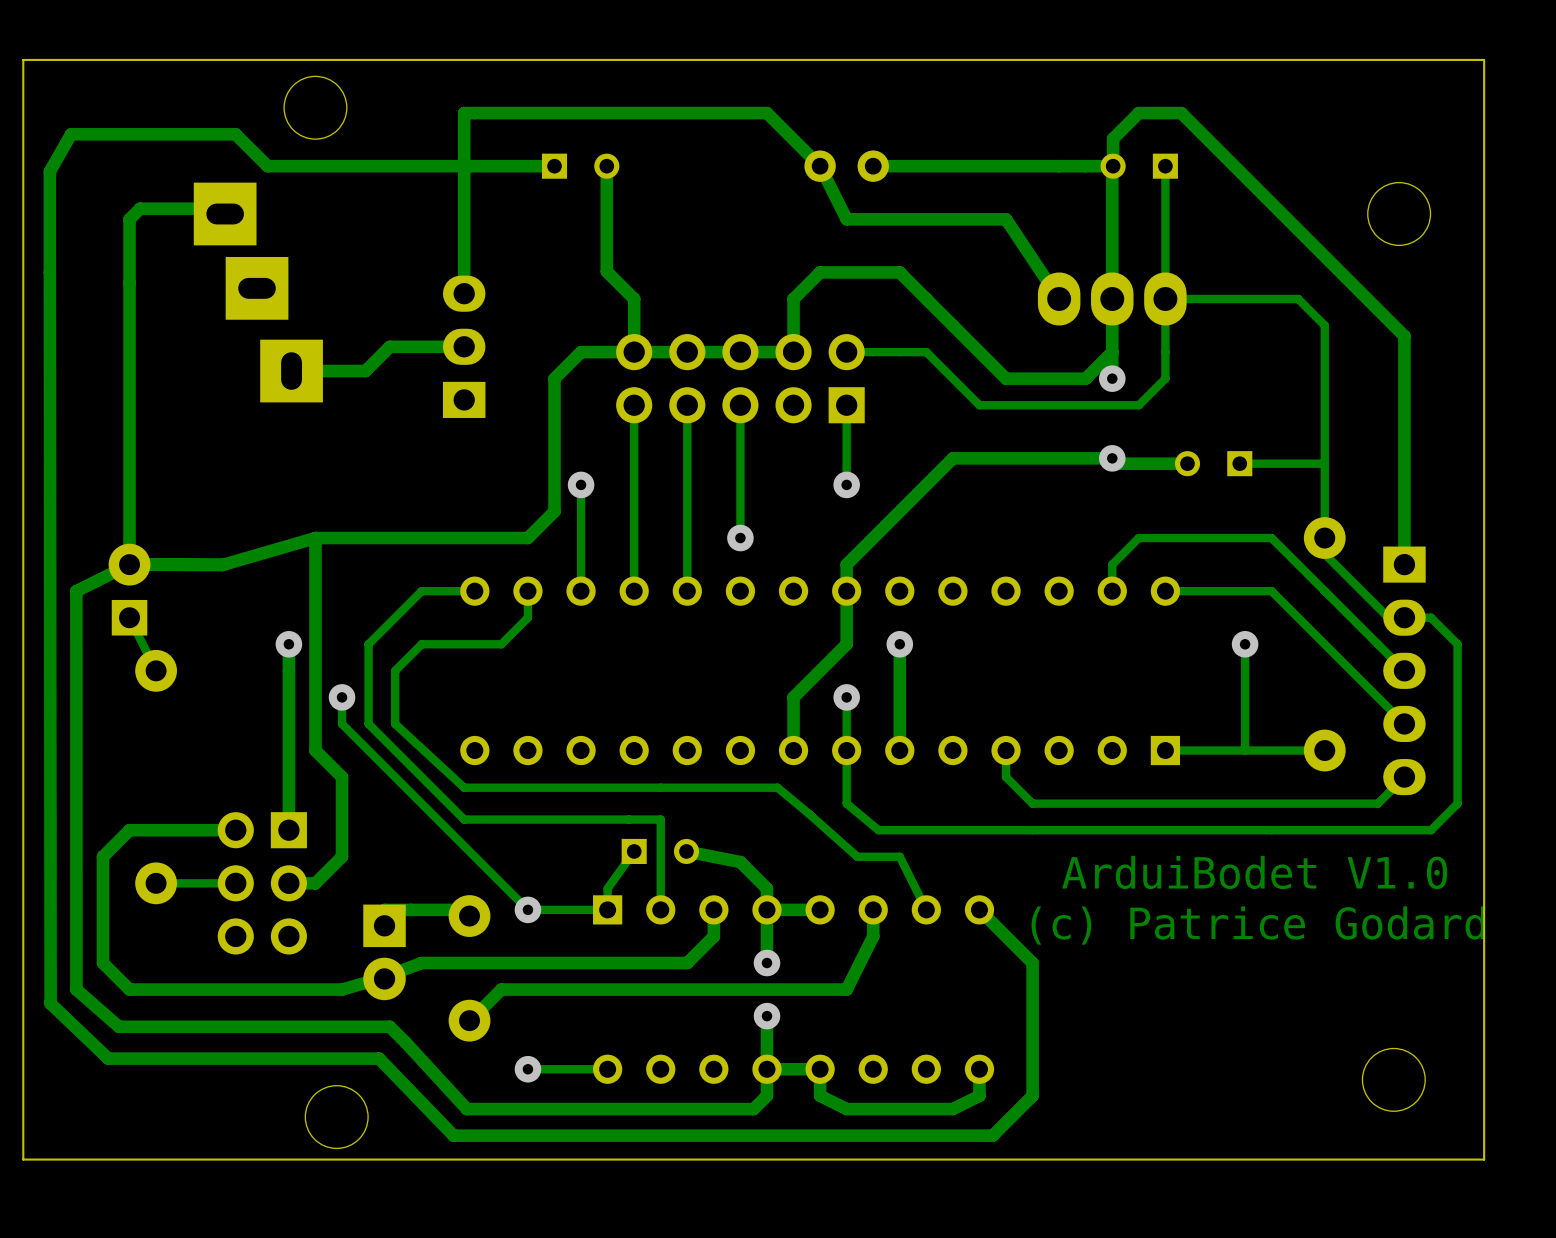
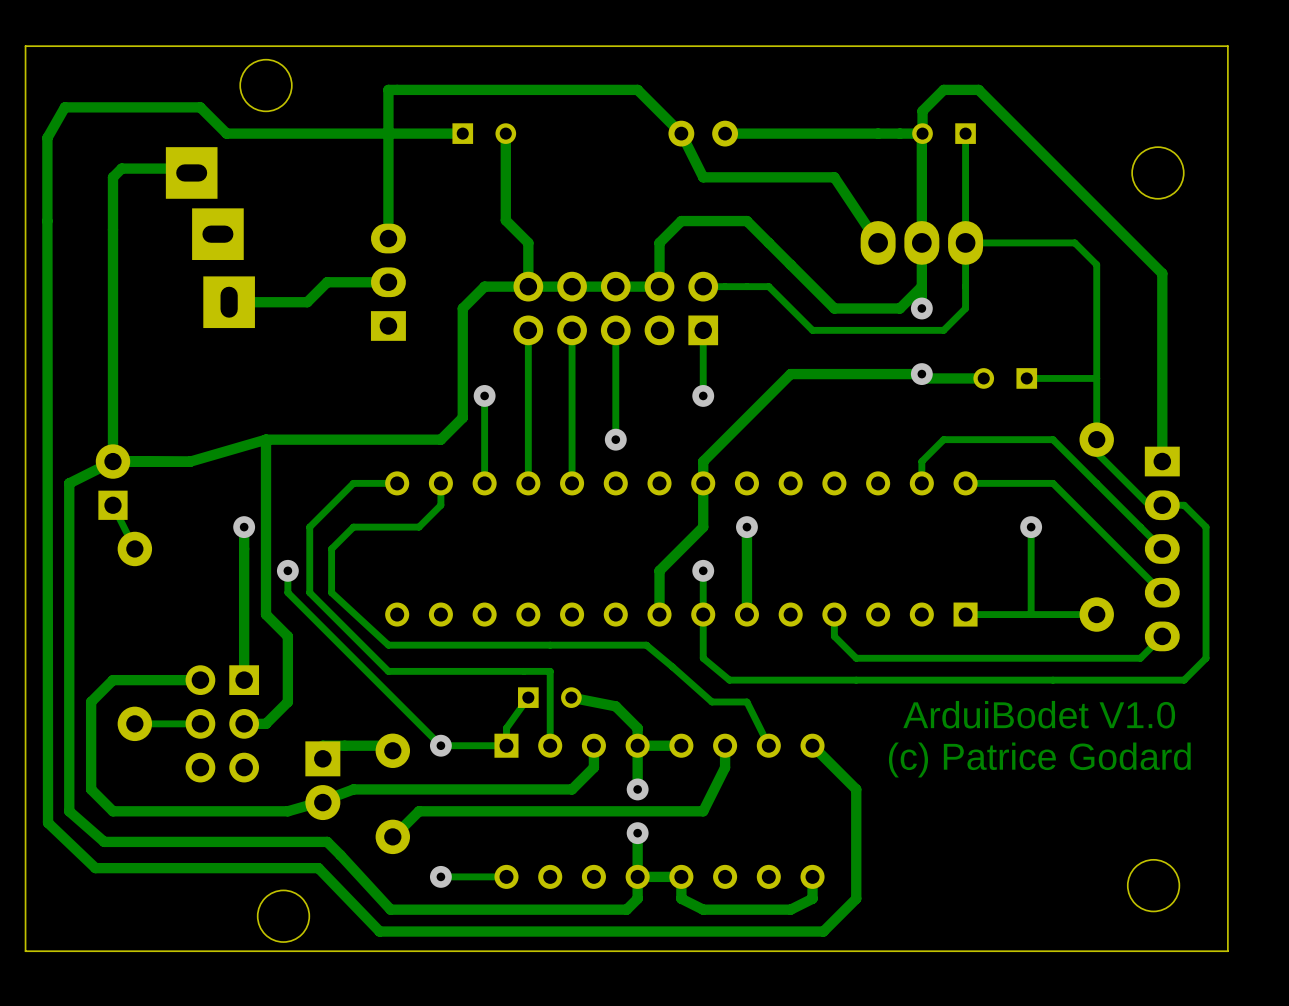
part footprint: [193, 182, 323, 403] -> [165, 147, 255, 329]

